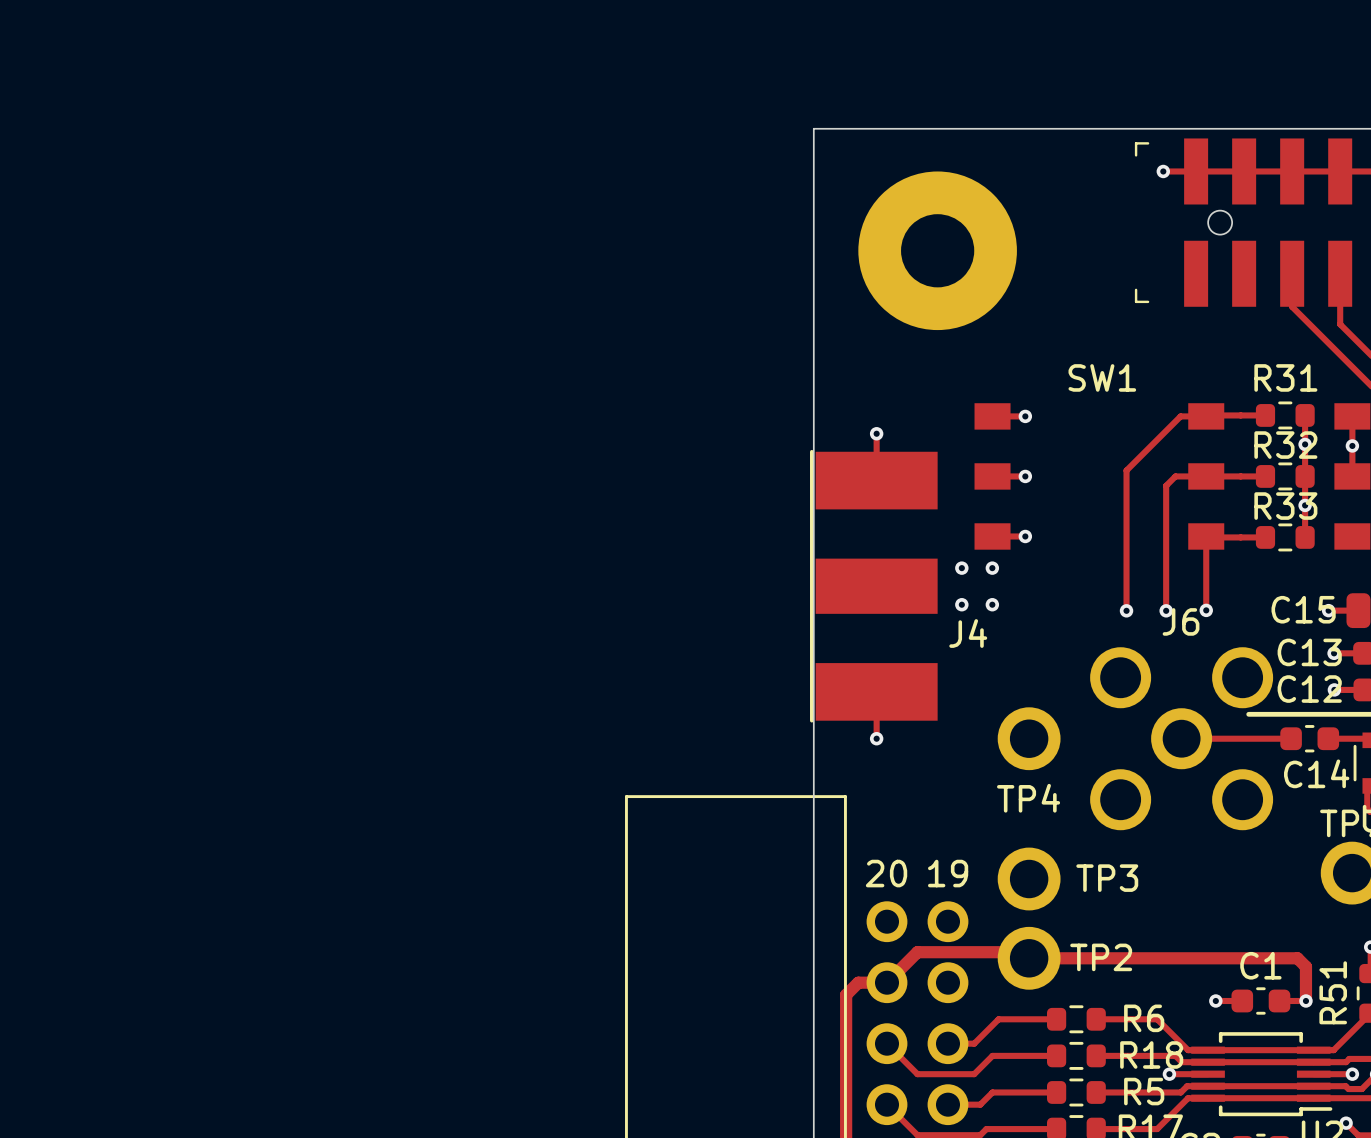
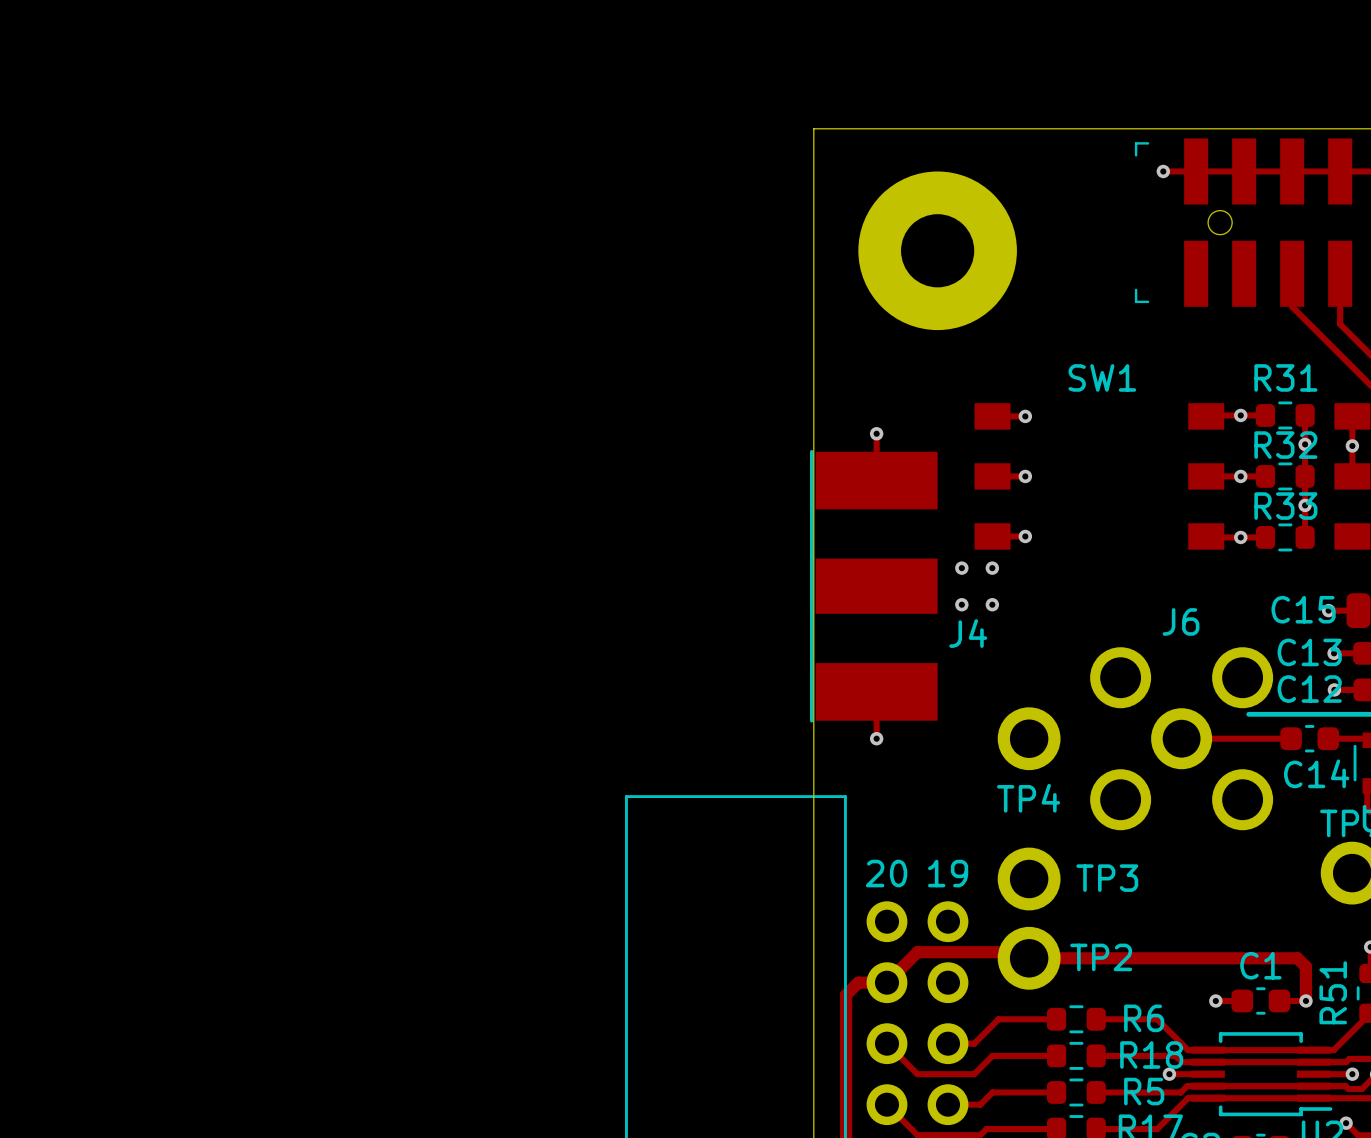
via: none -> (1240, 415)
track: (1206, 416) (1180, 416) (1126, 470) (1126, 610) -> none
track: (1206, 476) (1175, 476) (1166, 485) (1166, 610) -> none
via: none -> (1240, 476)
track: (1206, 536) (1206, 610) -> none
via: none -> (1240, 537)
via: (1126, 610) -> none
via: (1166, 610) -> none
via: (1206, 610) -> none

